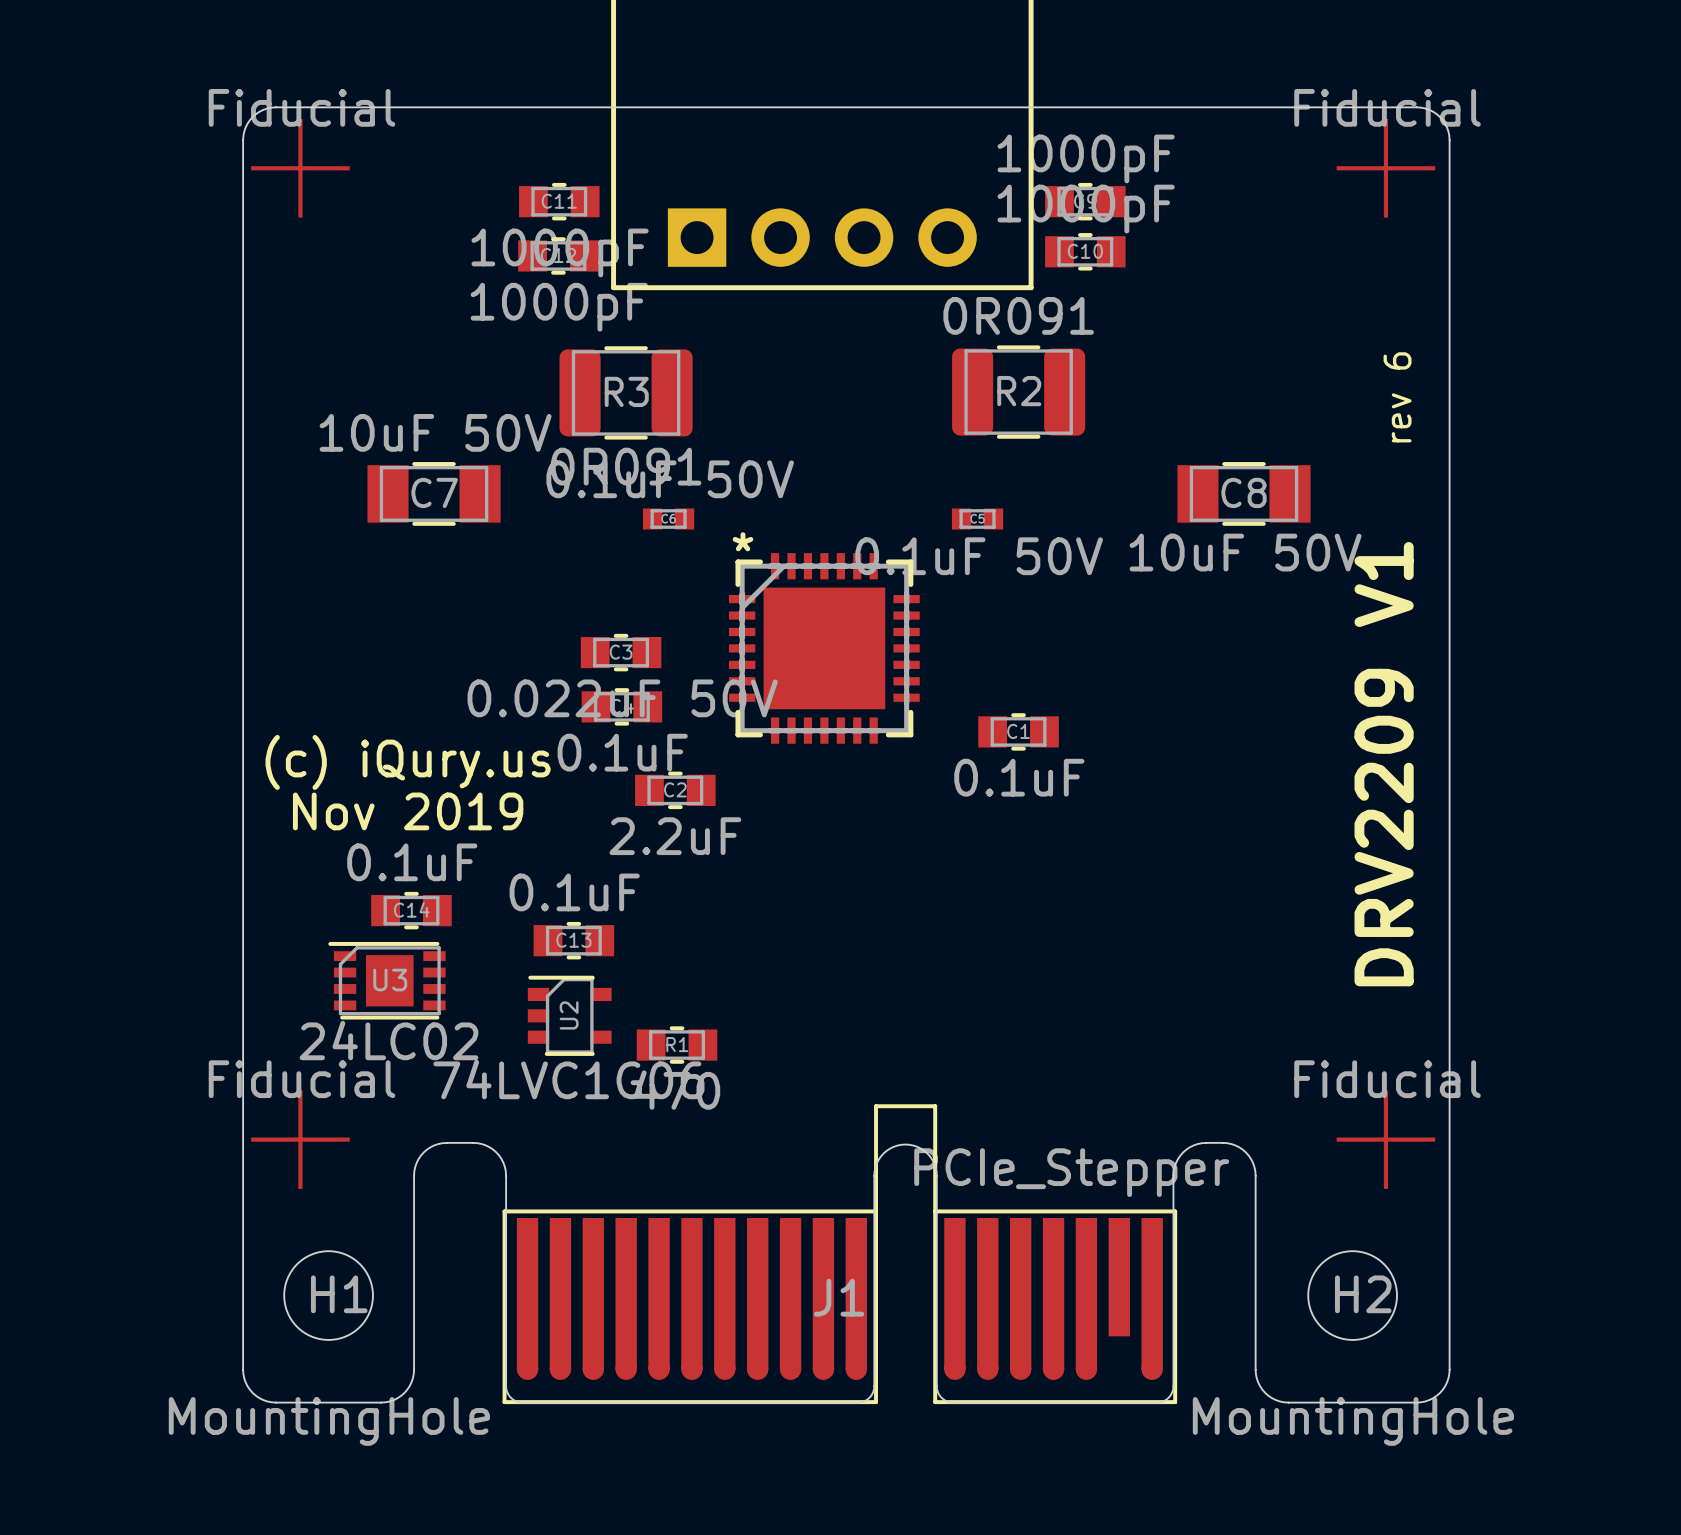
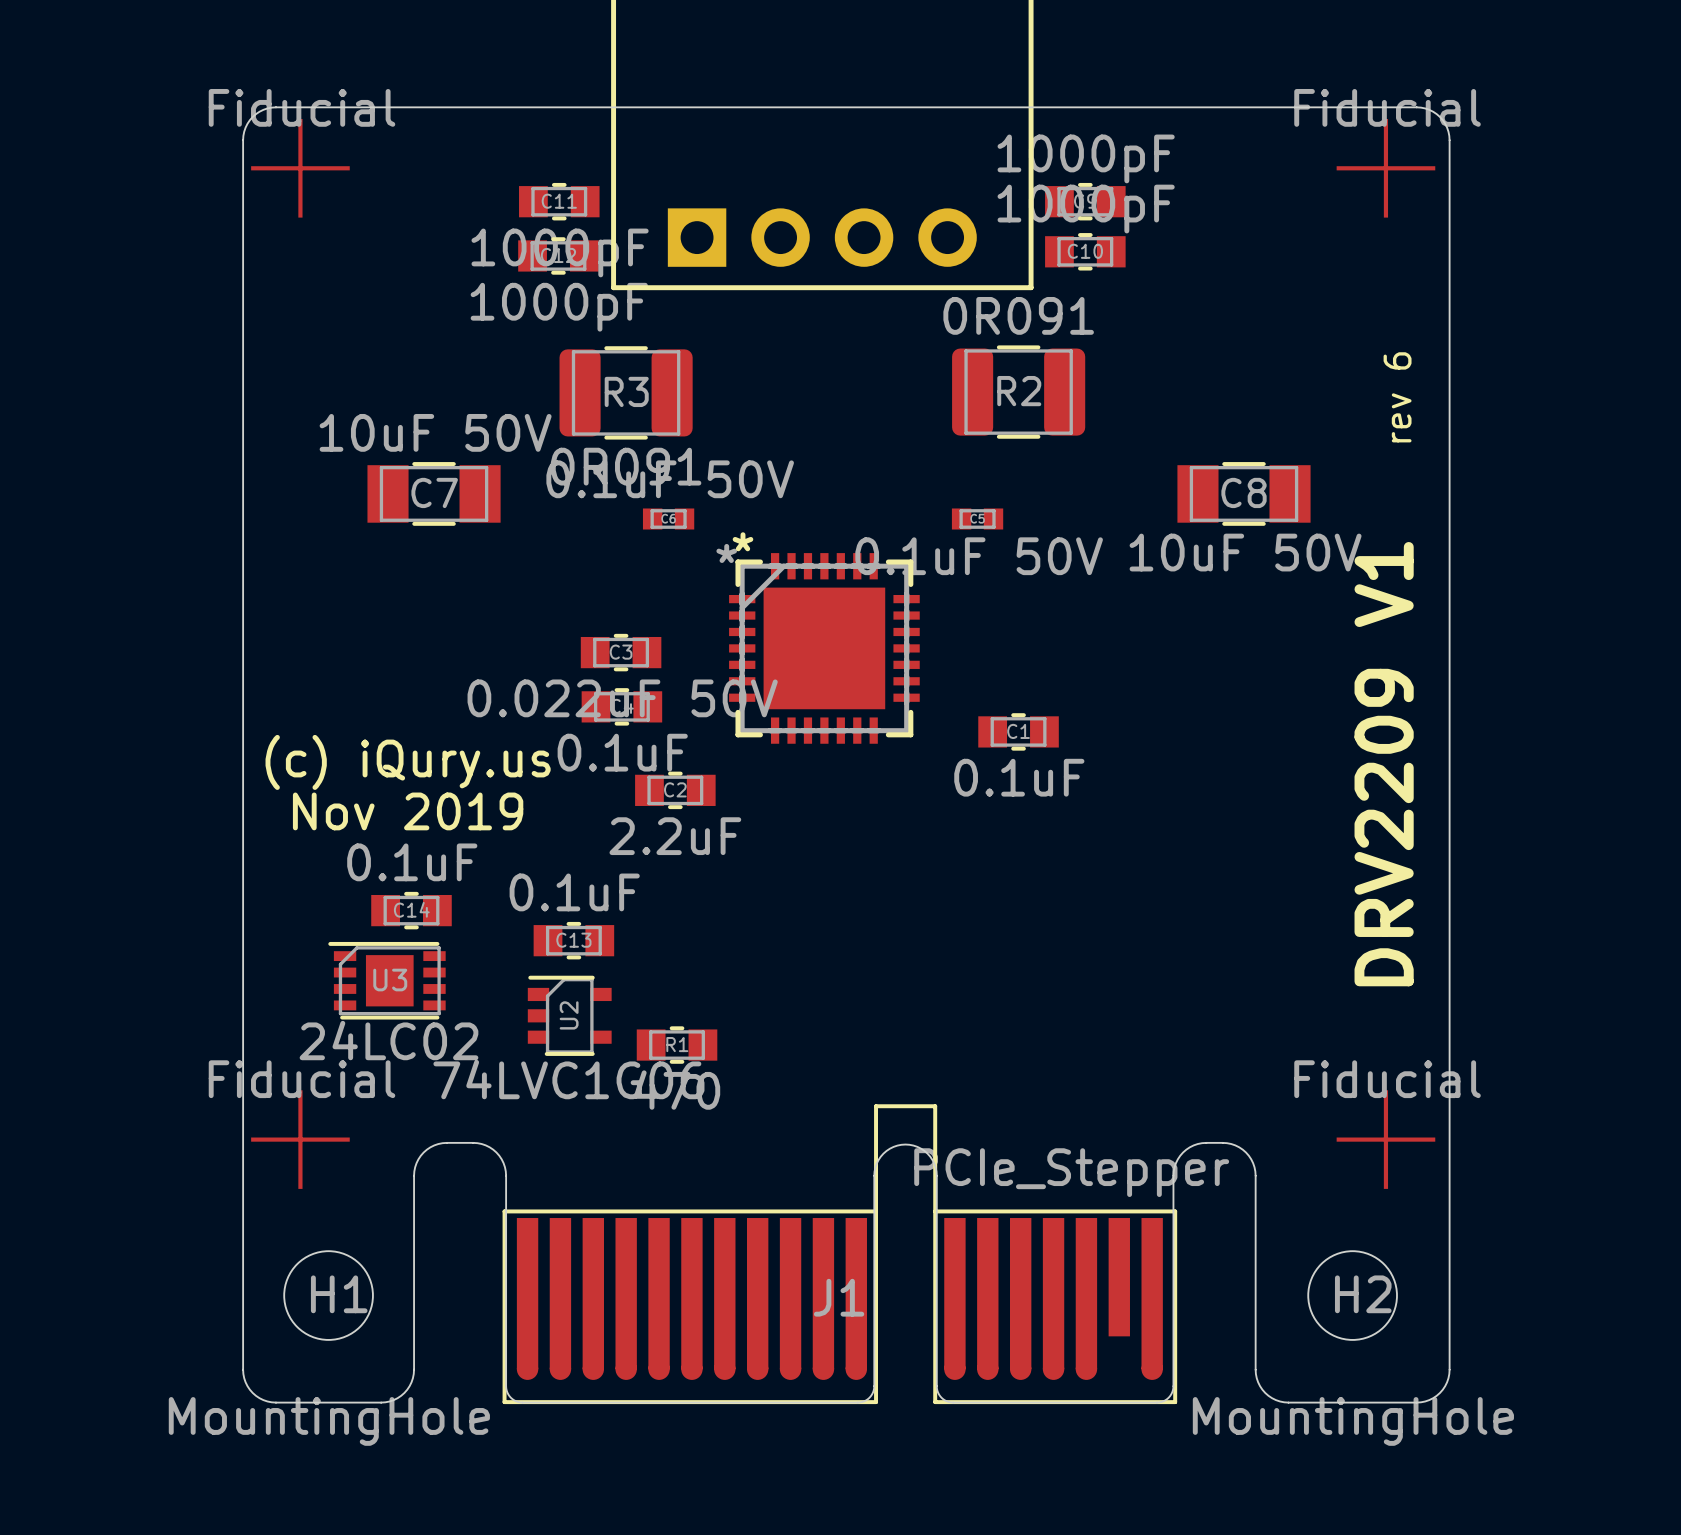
part text: none -> * (726, 553)

